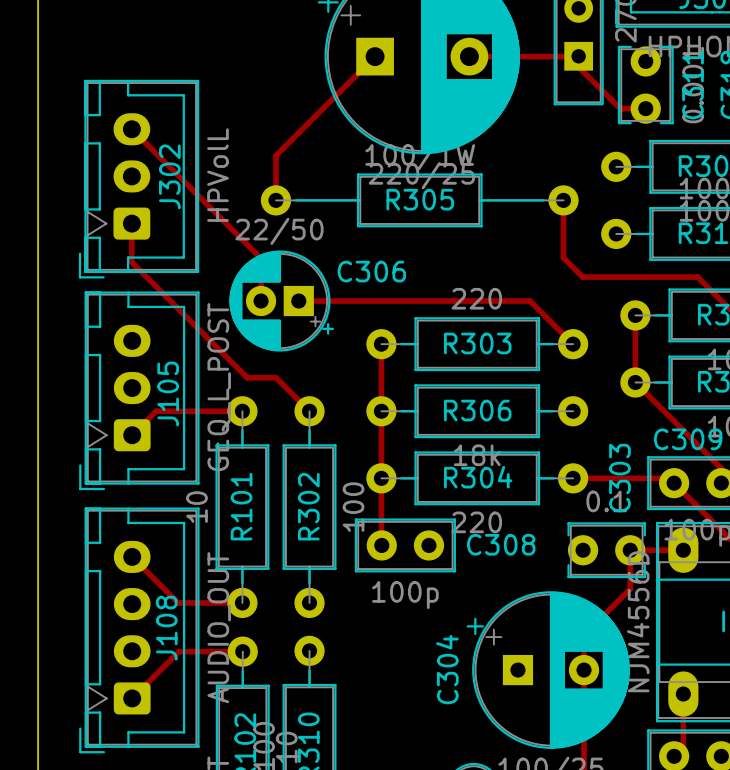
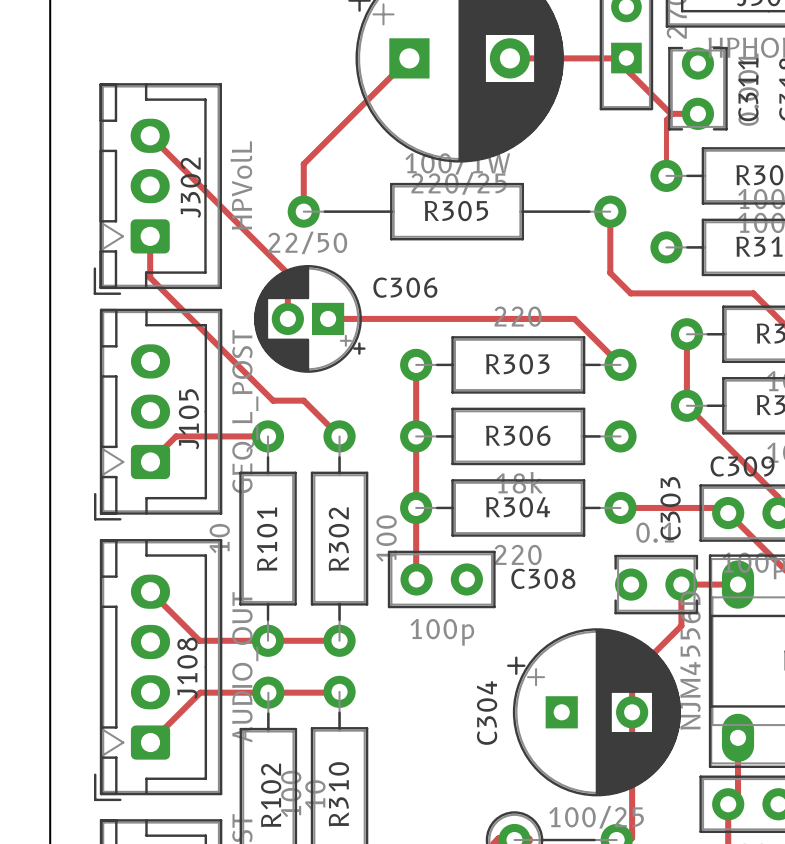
track: none -> (672, 113) (666, 119) (666, 175)
track: none -> (268, 640) (339, 640)
track: none -> (339, 691) (268, 692)

